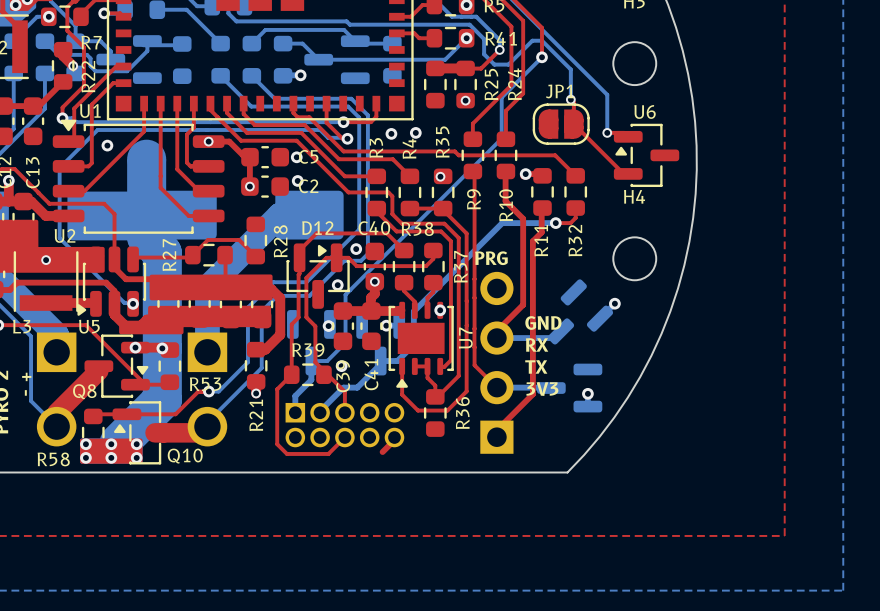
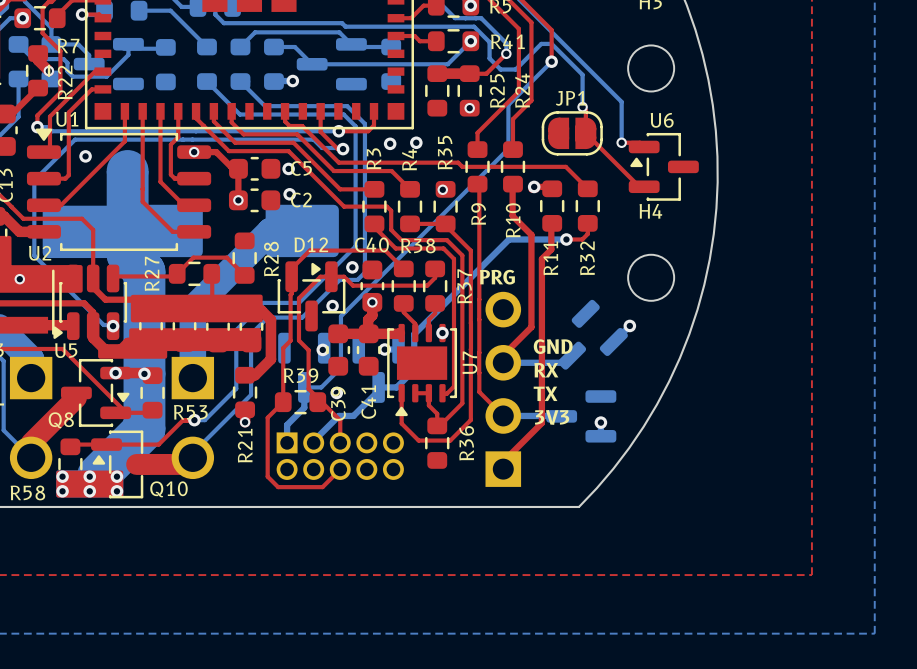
top track: (394, 440) (382, 452) -> none

